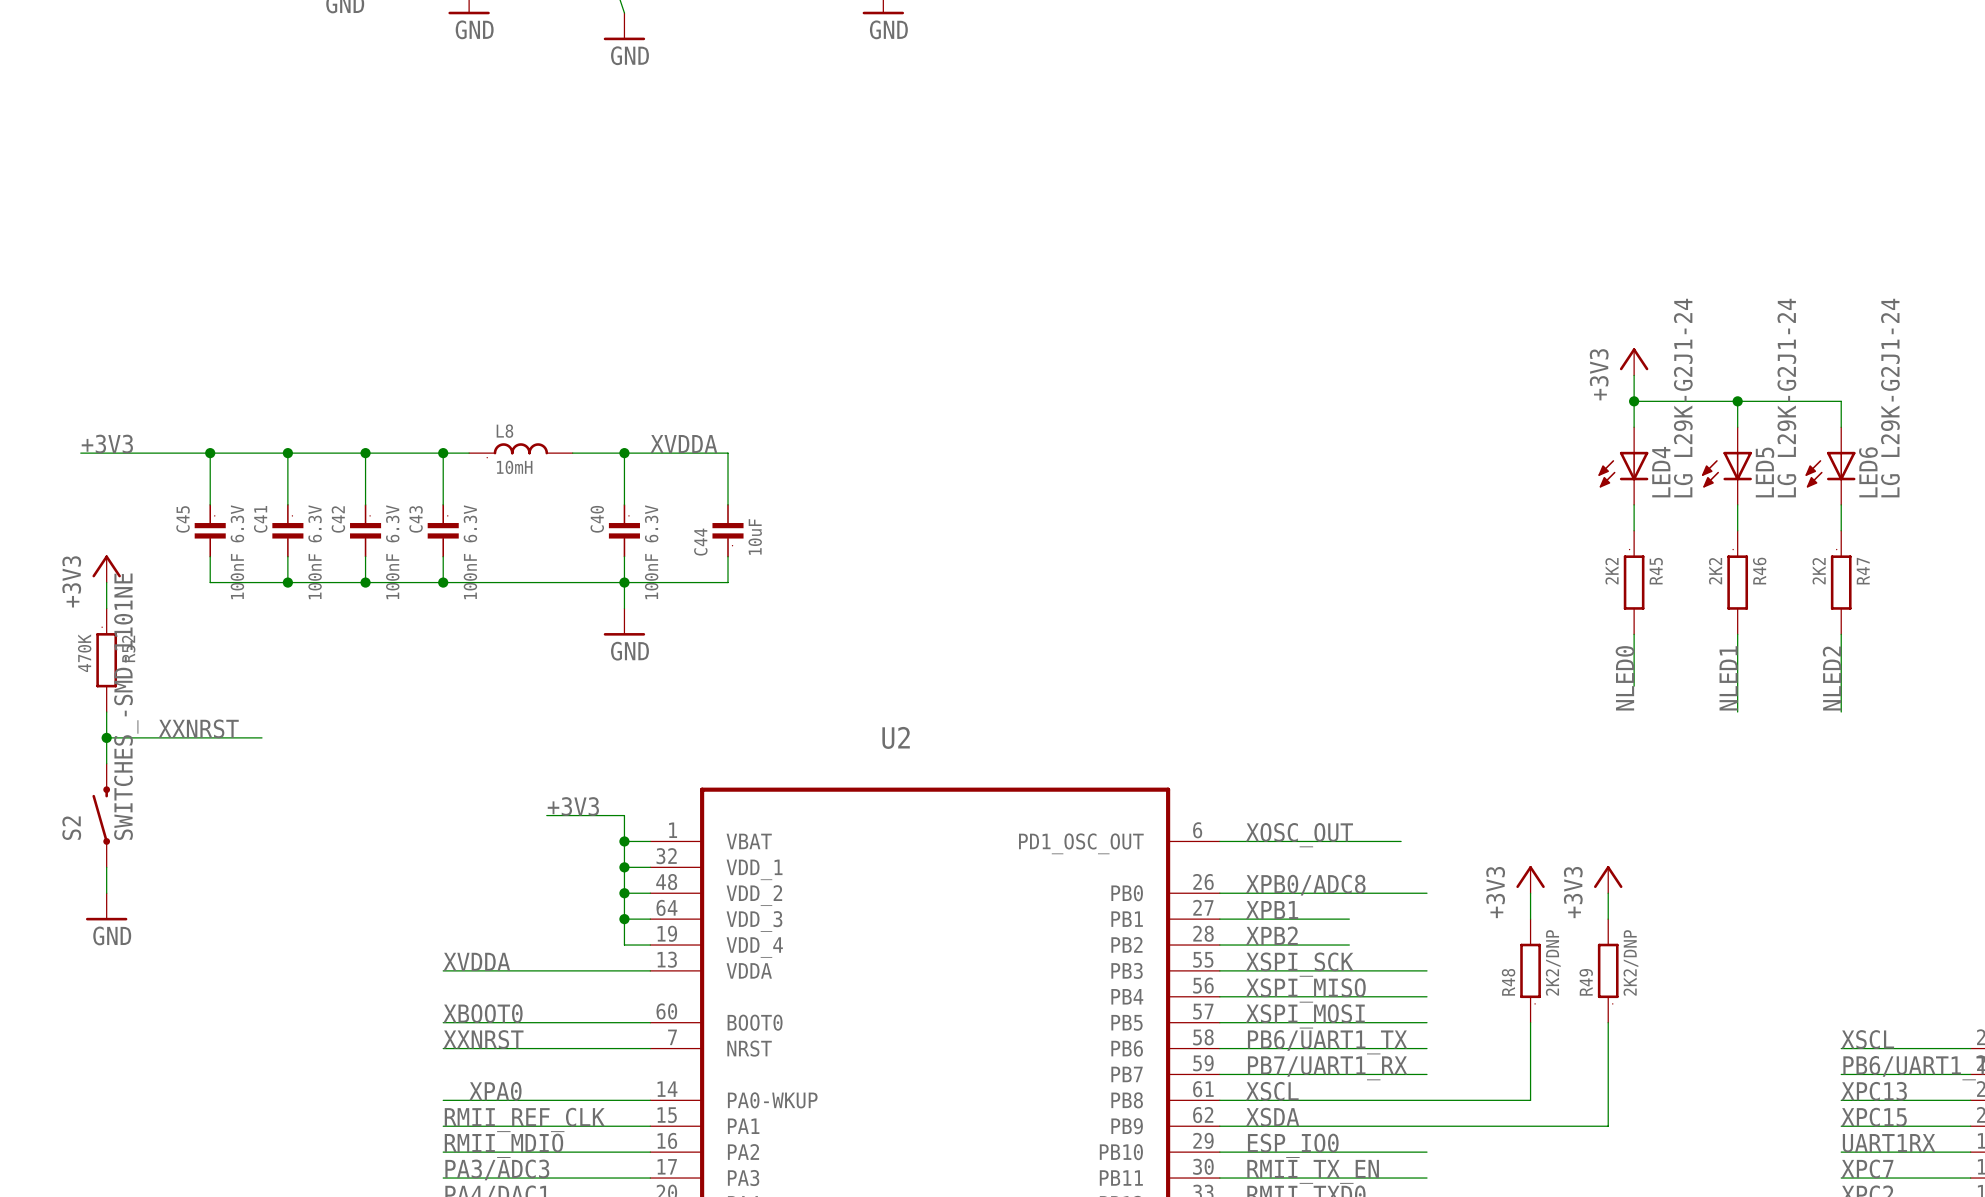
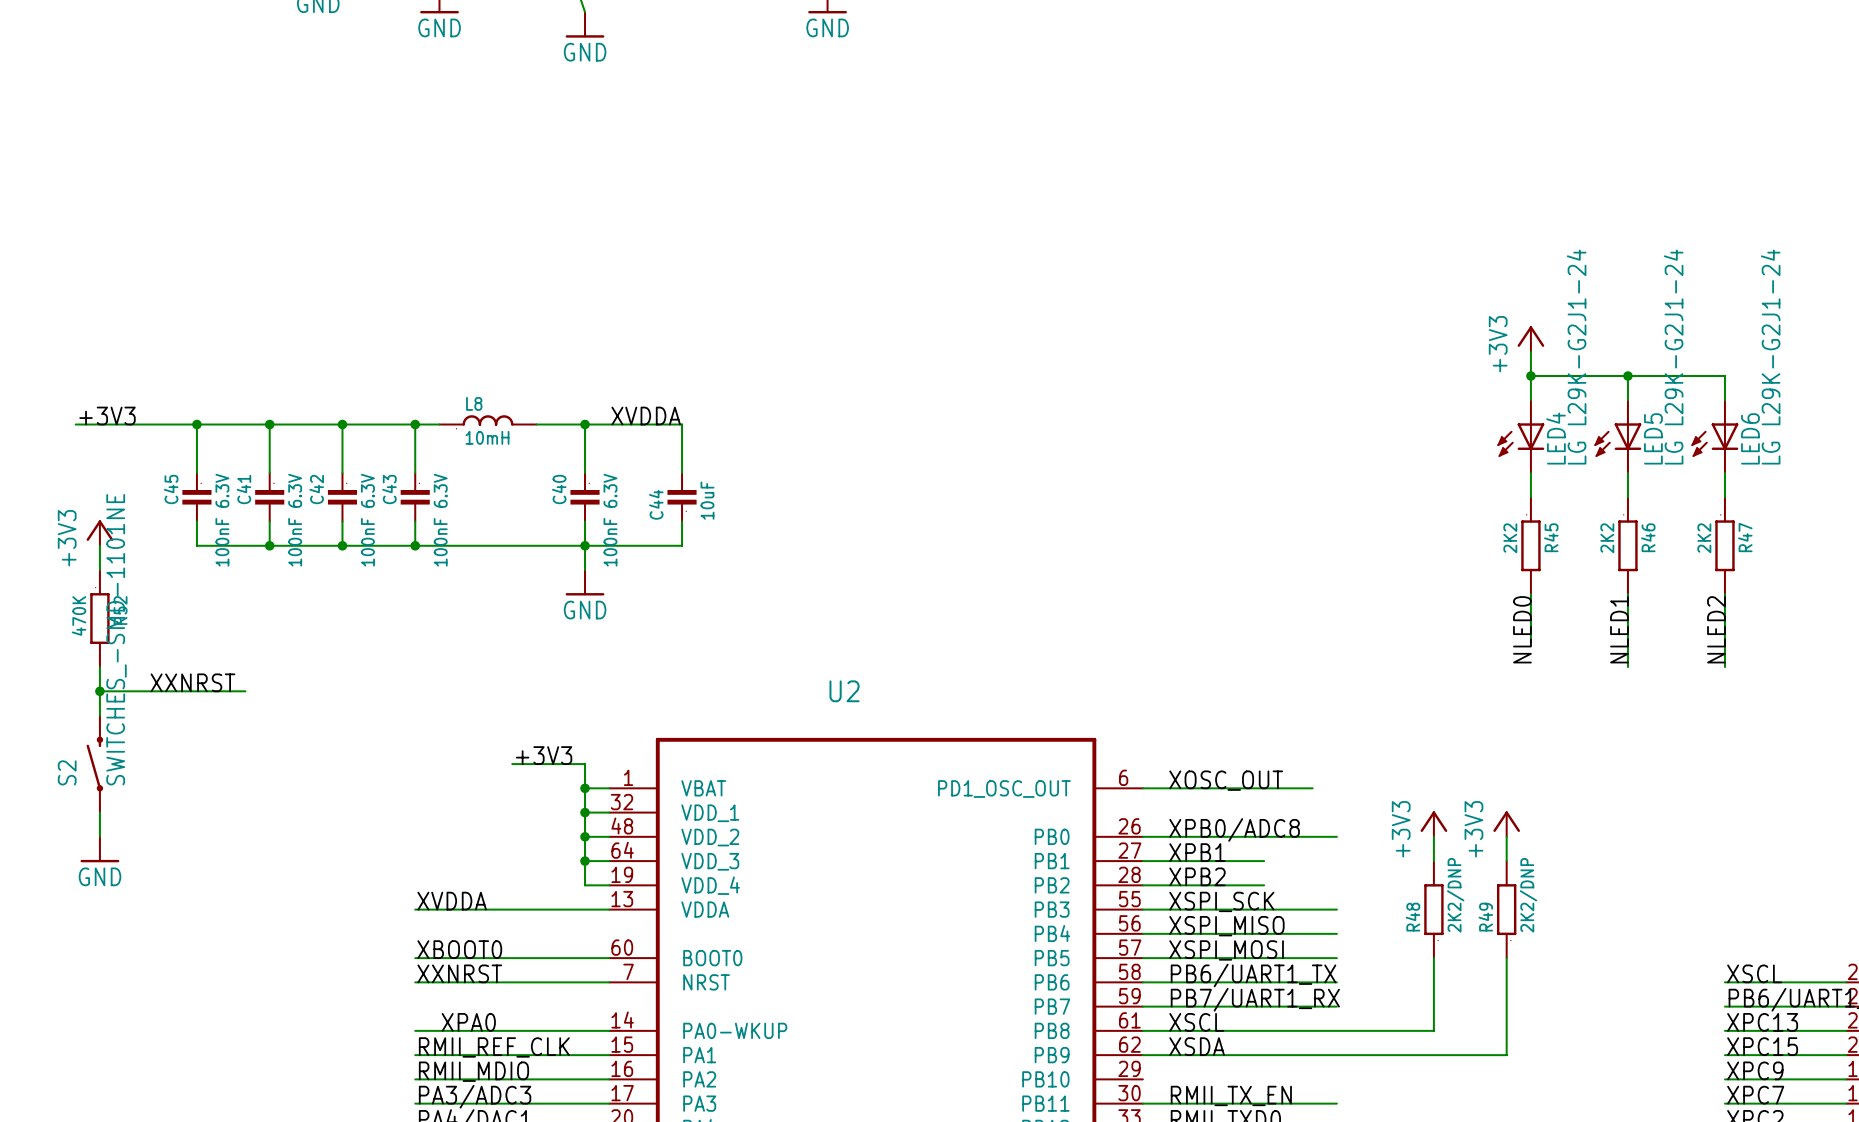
label: UART1RX (1889, 1143) -> XPC9 (1755, 1070)
label: ESP_IO0 (1293, 1145) -> none
wire: (1219, 1152) (1427, 1152) -> none

